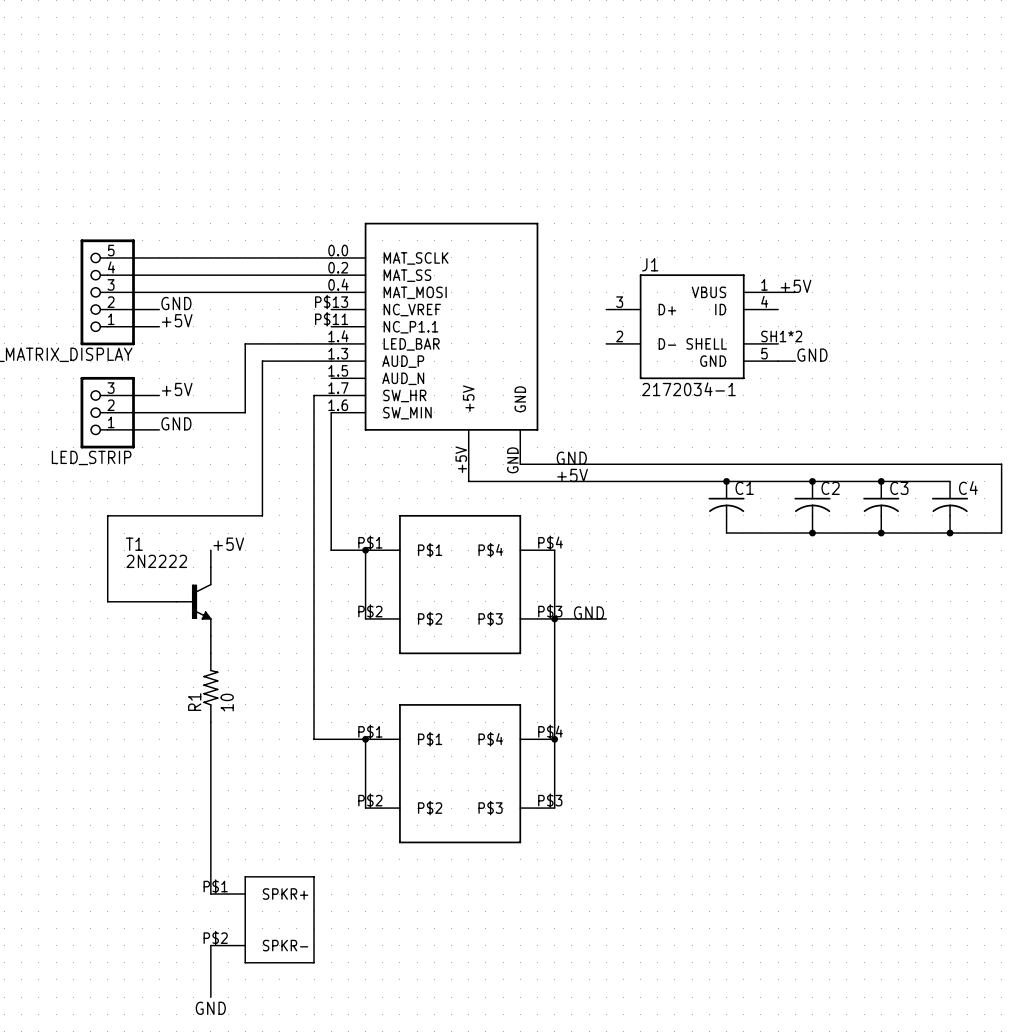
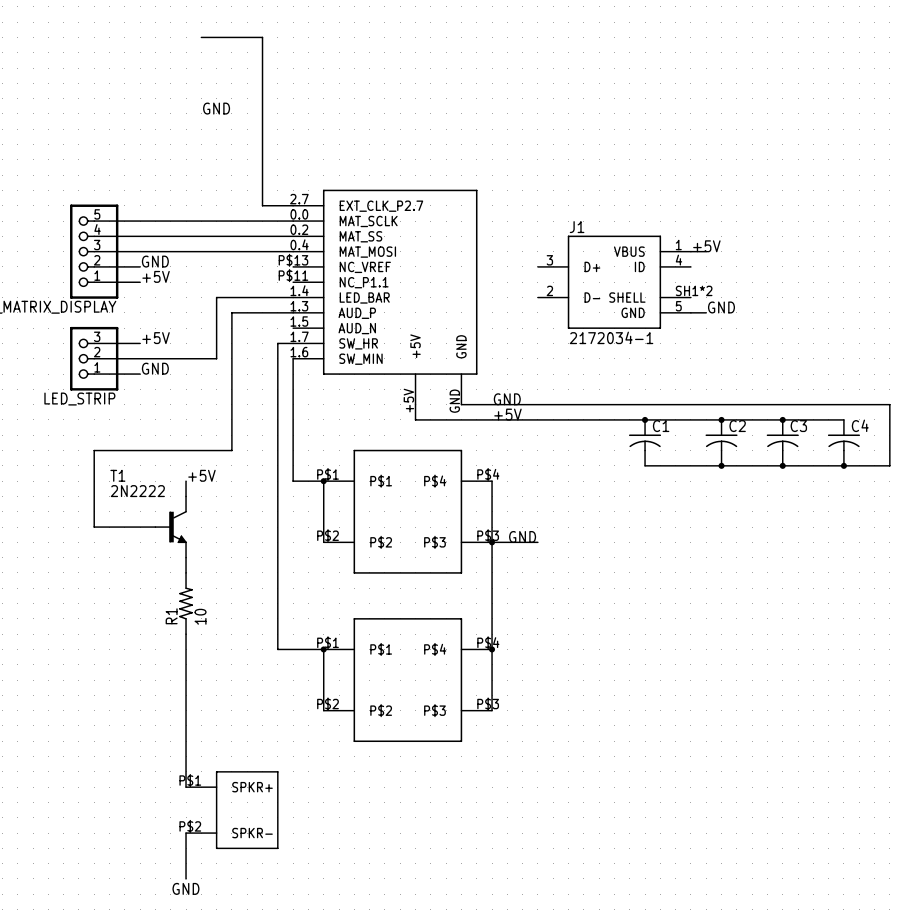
wire: none -> (201, 37) (262, 37) (262, 205) (293, 205)
label: none -> GND (216, 108)
part symbol: [331, 222, 539, 465] -> [293, 189, 478, 405]

